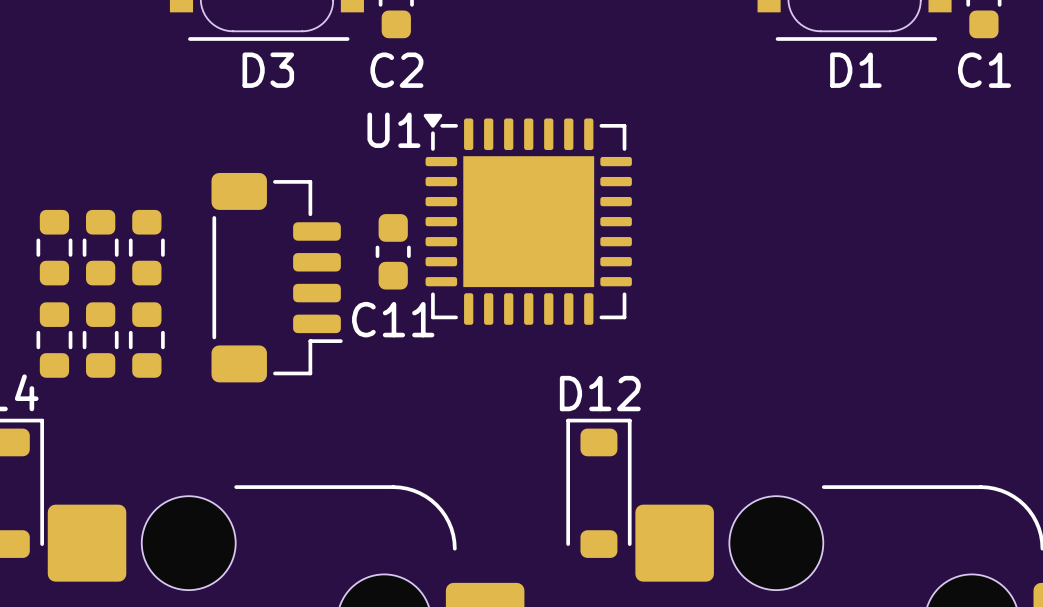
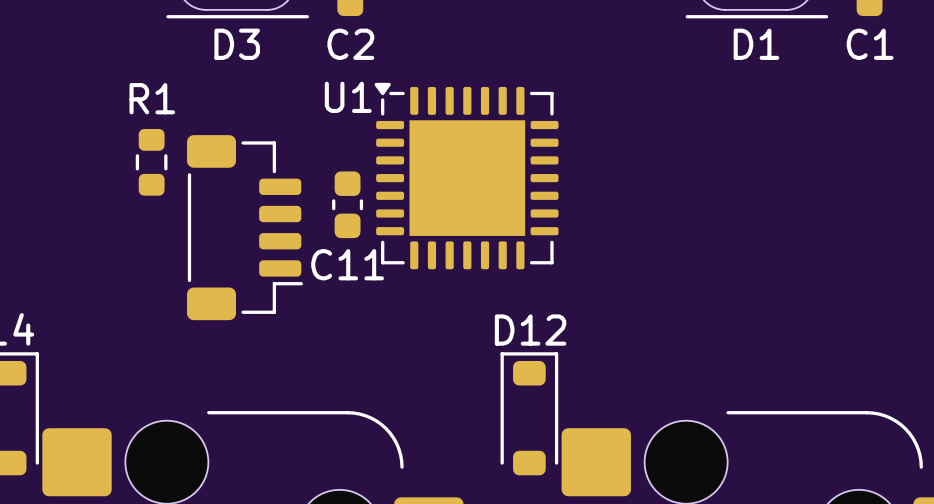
R1: none -> (151, 162)
part: (54, 247) -> none
part: (100, 247) -> none
part: (146, 247) -> none
part: (54, 340) -> none
part: (100, 340) -> none
part: (146, 340) -> none

